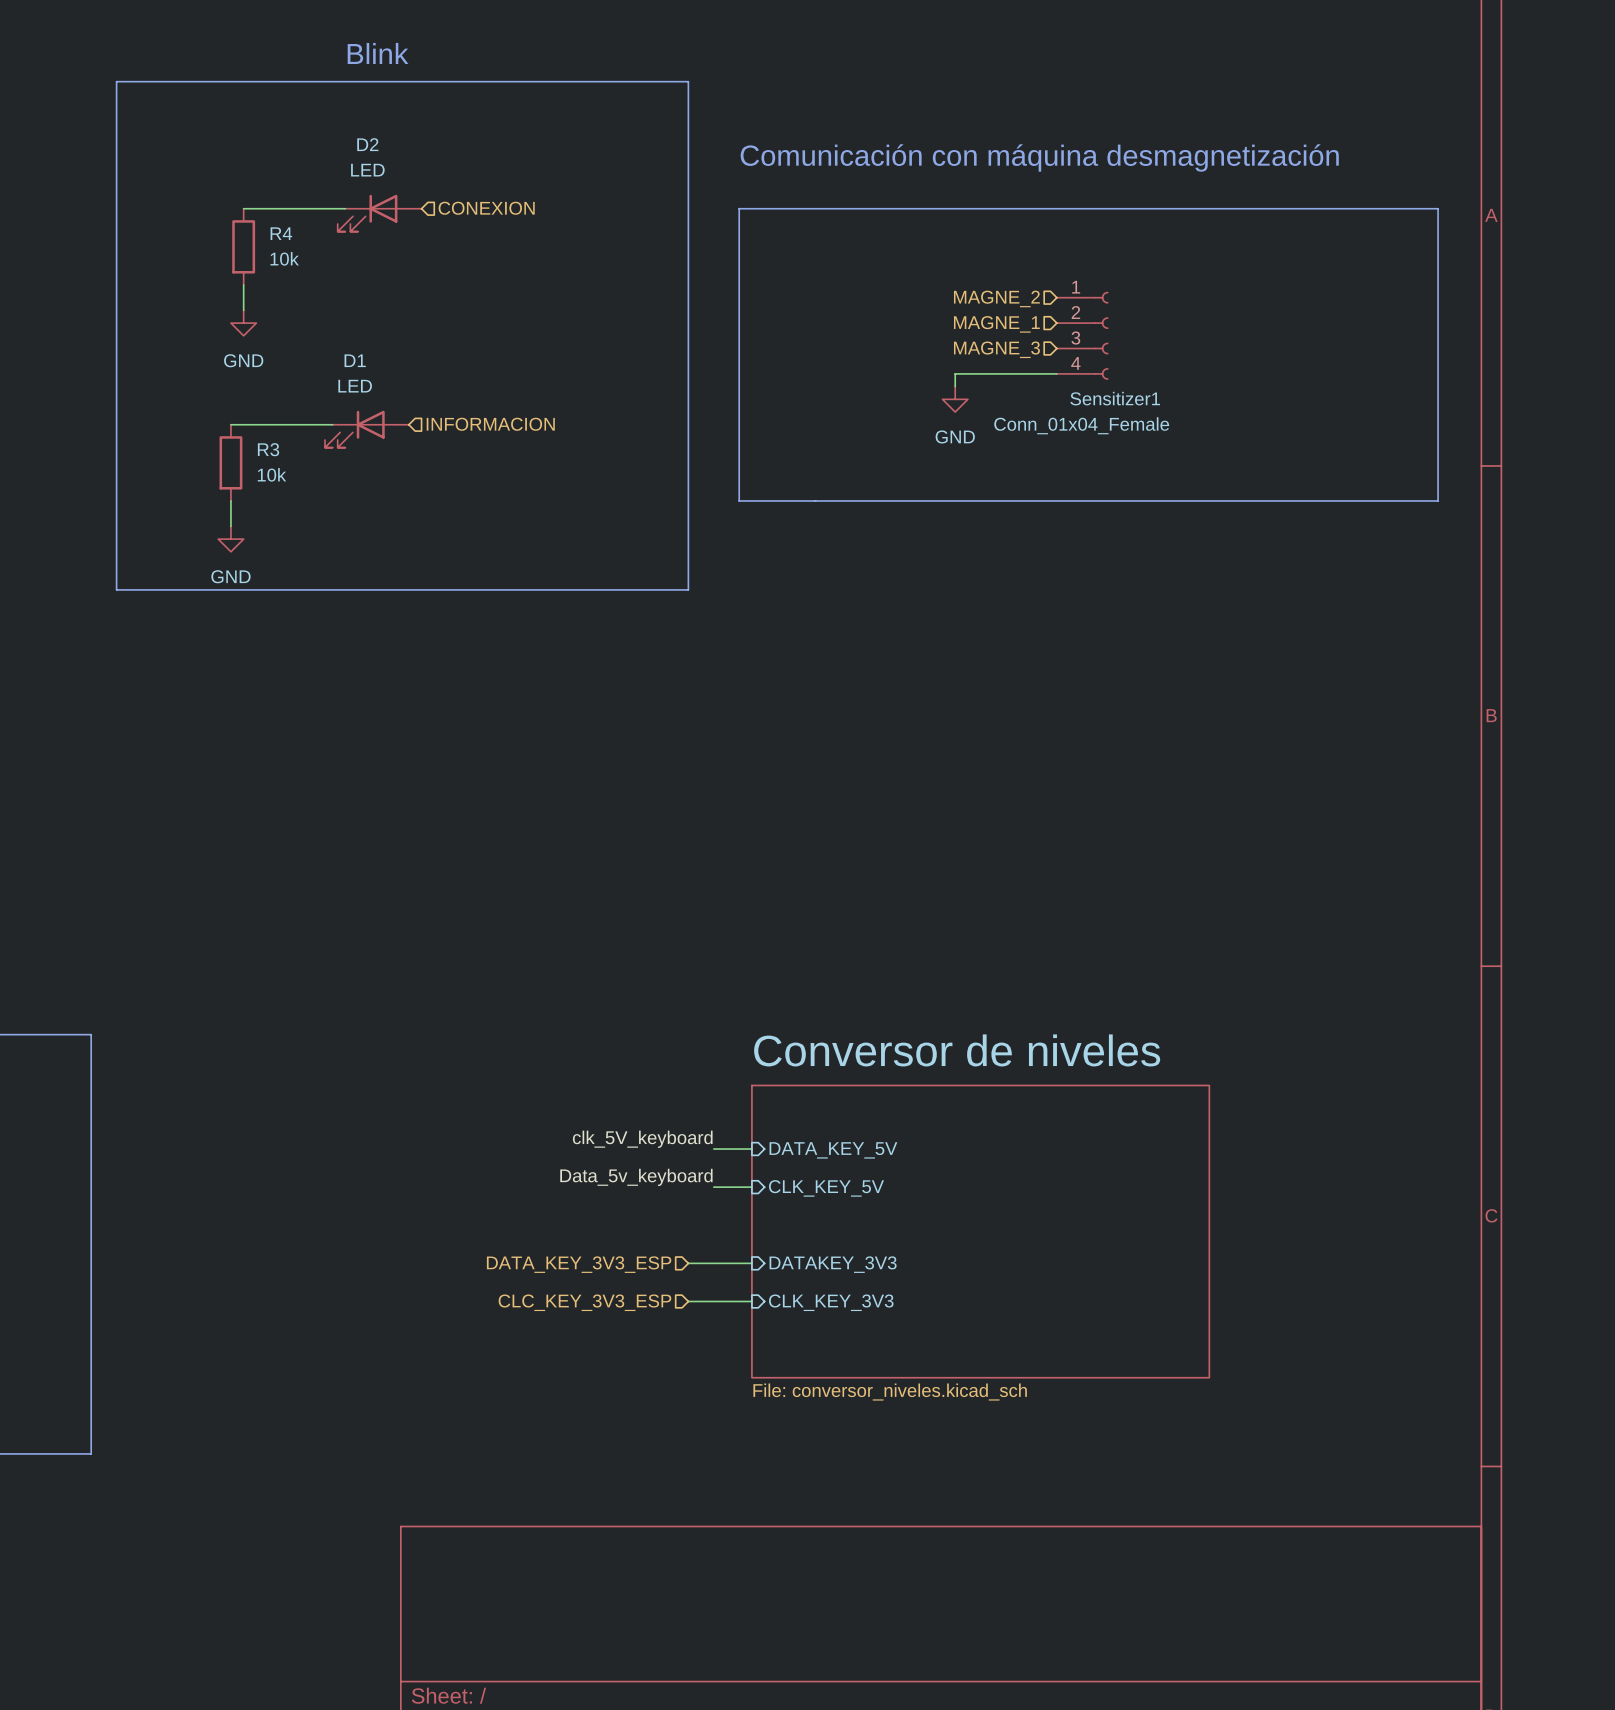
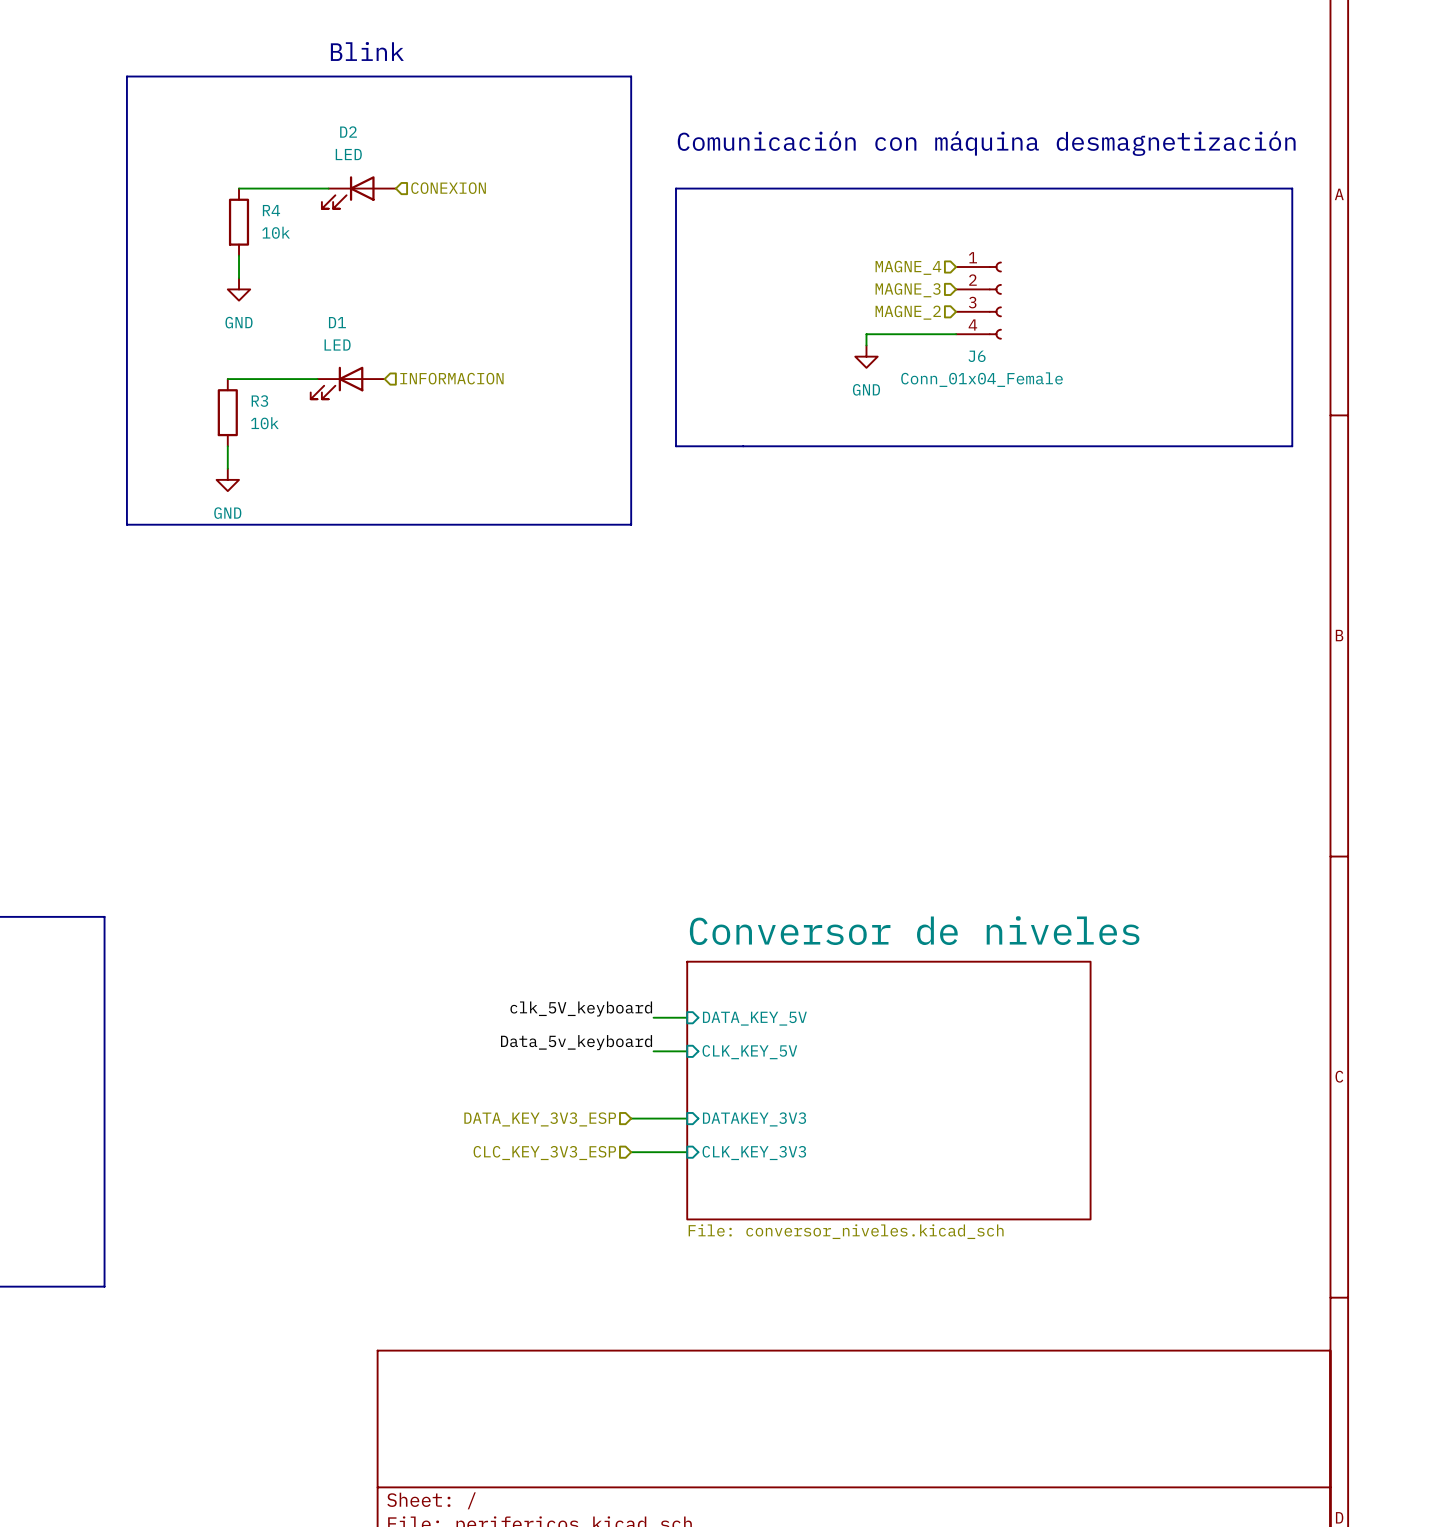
hierarchical label: MAGNE_2 (996, 298) -> MAGNE_4 (908, 267)
hierarchical label: MAGNE_1 (996, 324) -> MAGNE_3 (908, 290)
hierarchical label: MAGNE_3 (996, 349) -> MAGNE_2 (908, 312)
Sensitizer1 name: Sensitizer1 (1115, 398) -> J6 (977, 356)

